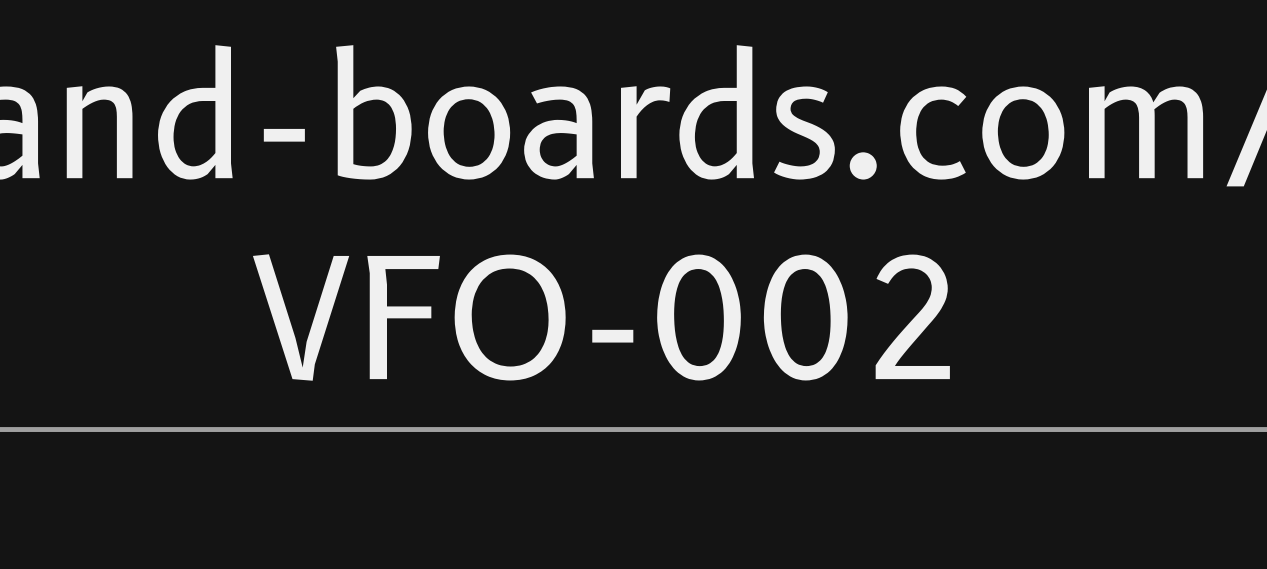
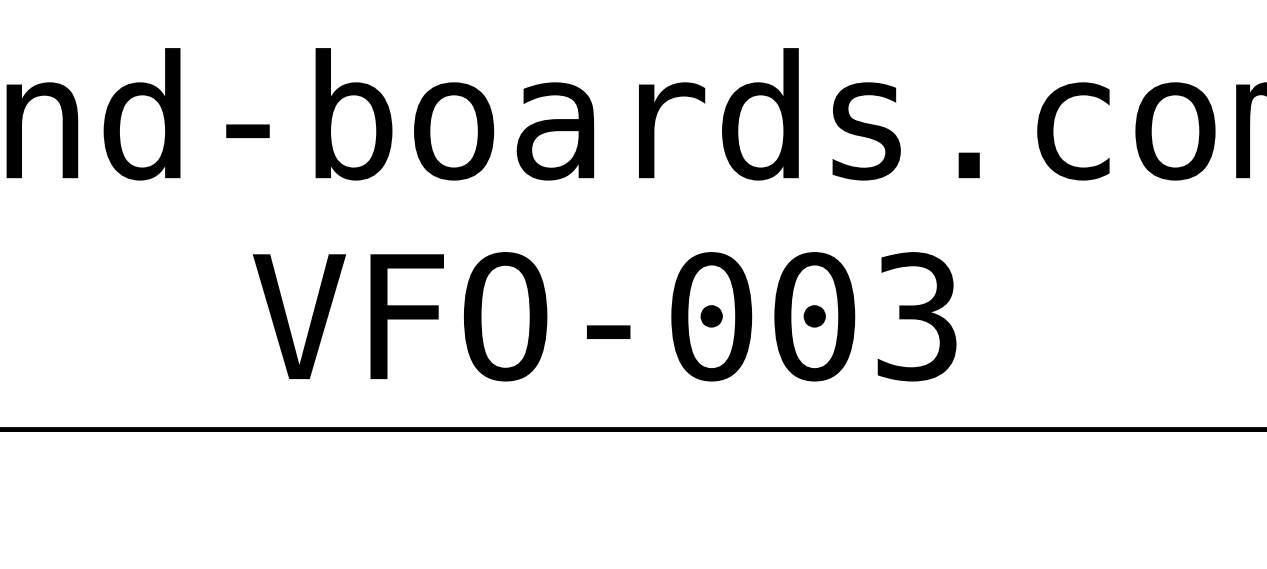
text: VFO-002 (601, 317) -> VFO-003 (604, 316)

